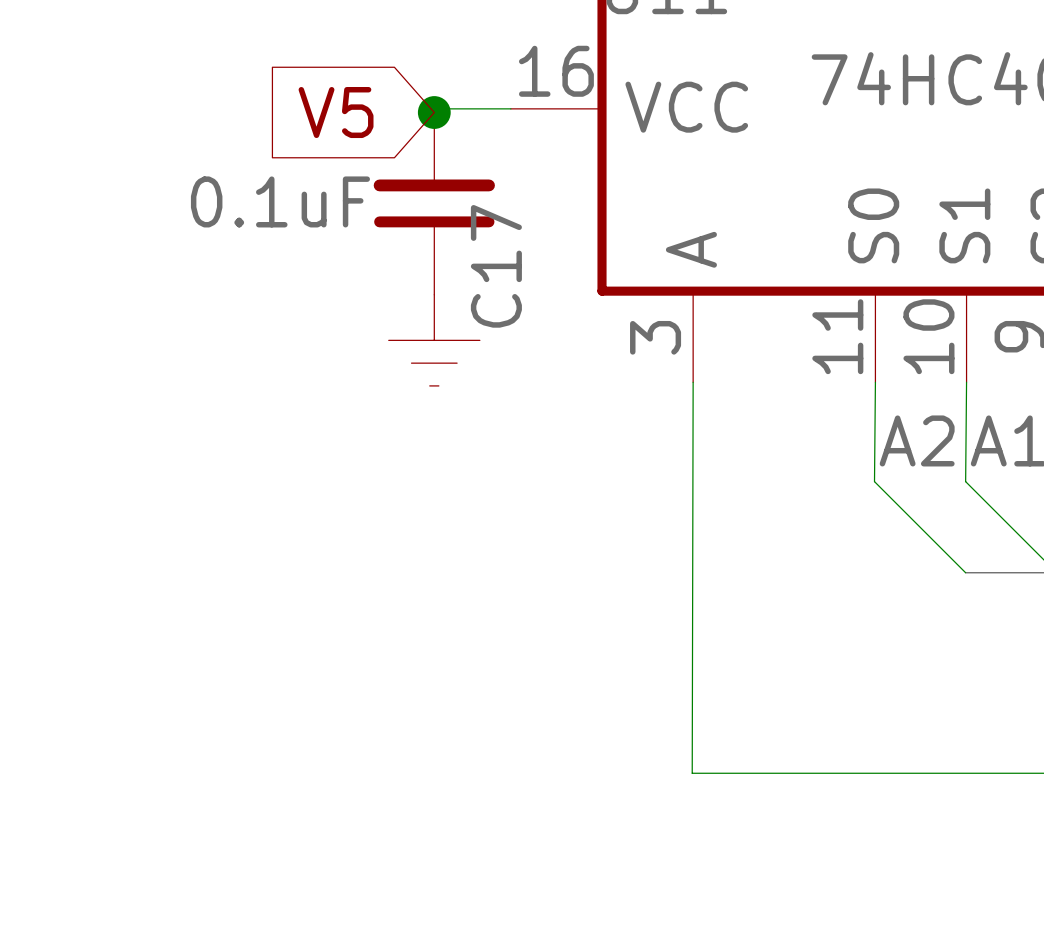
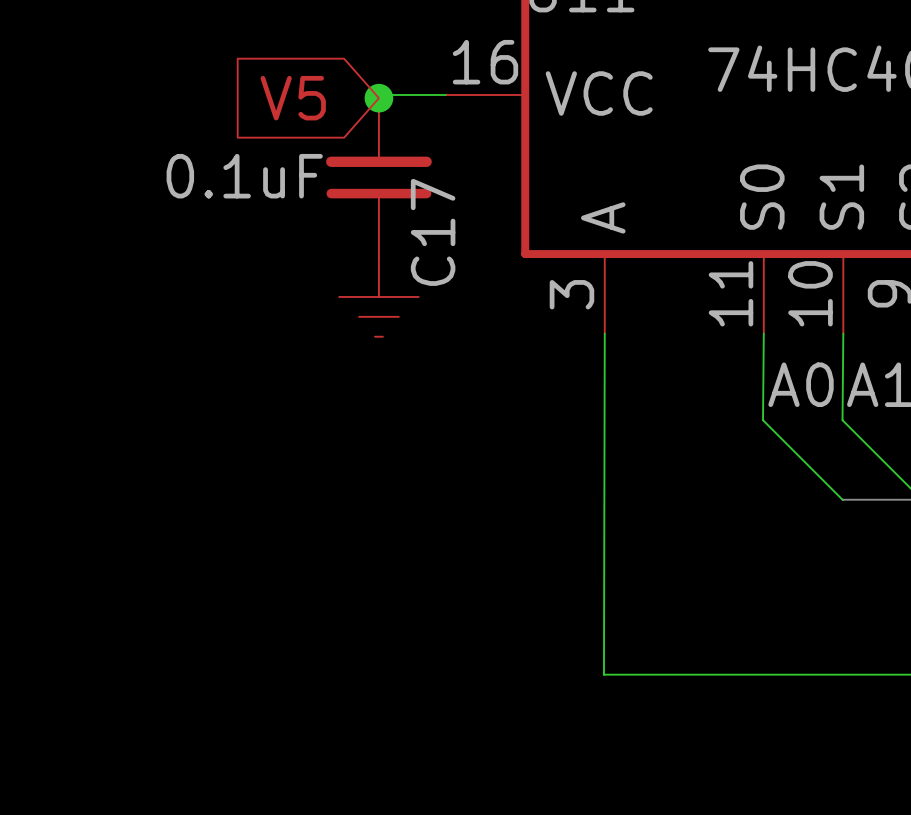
label: A2 (917, 440) -> A0 (801, 384)

